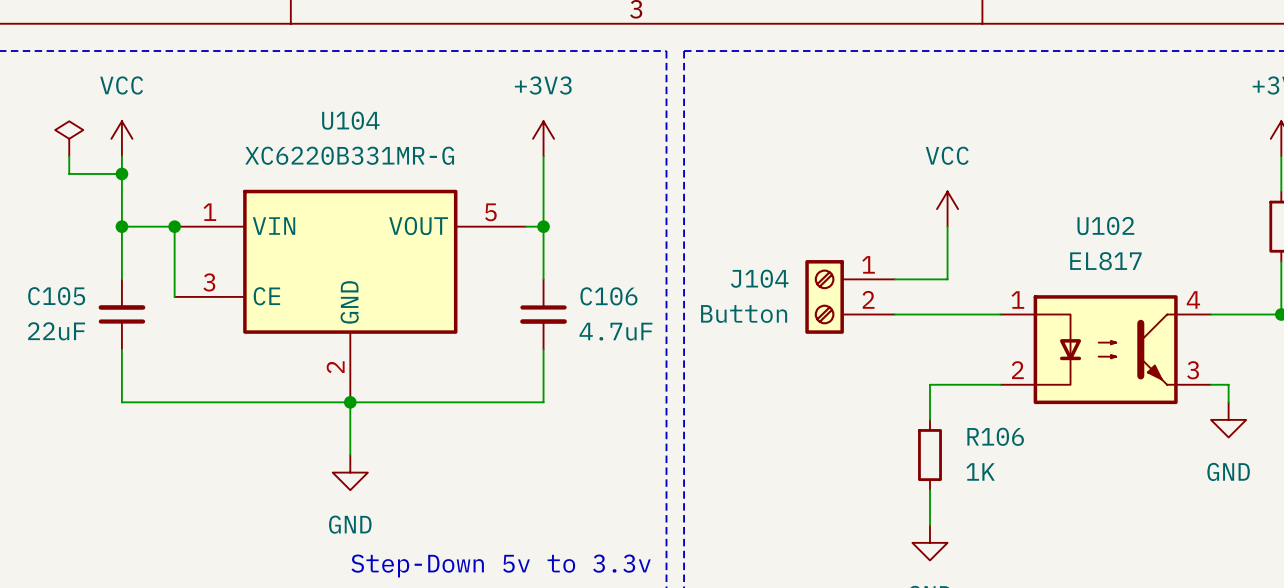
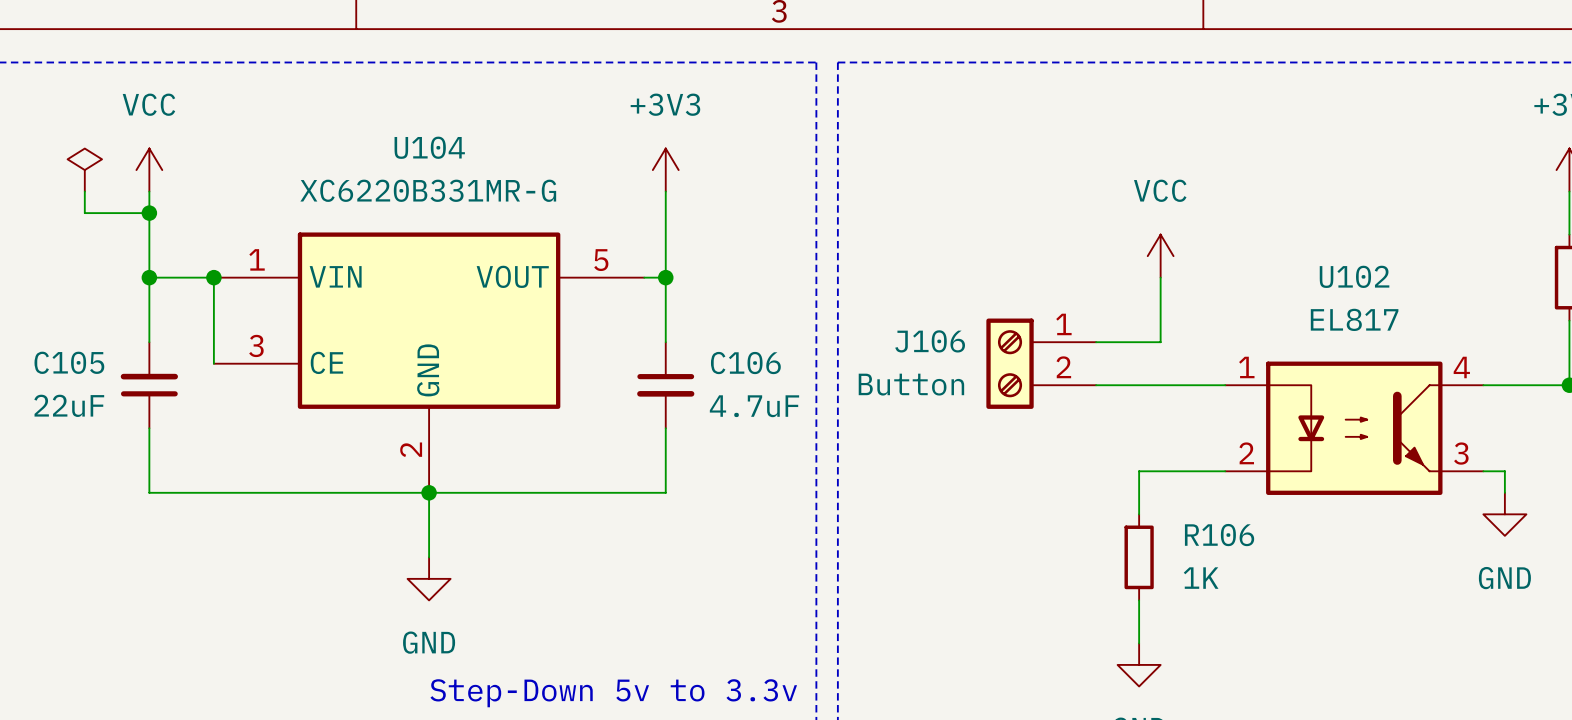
J104 name: J104 (759, 278) -> J106 (930, 341)

